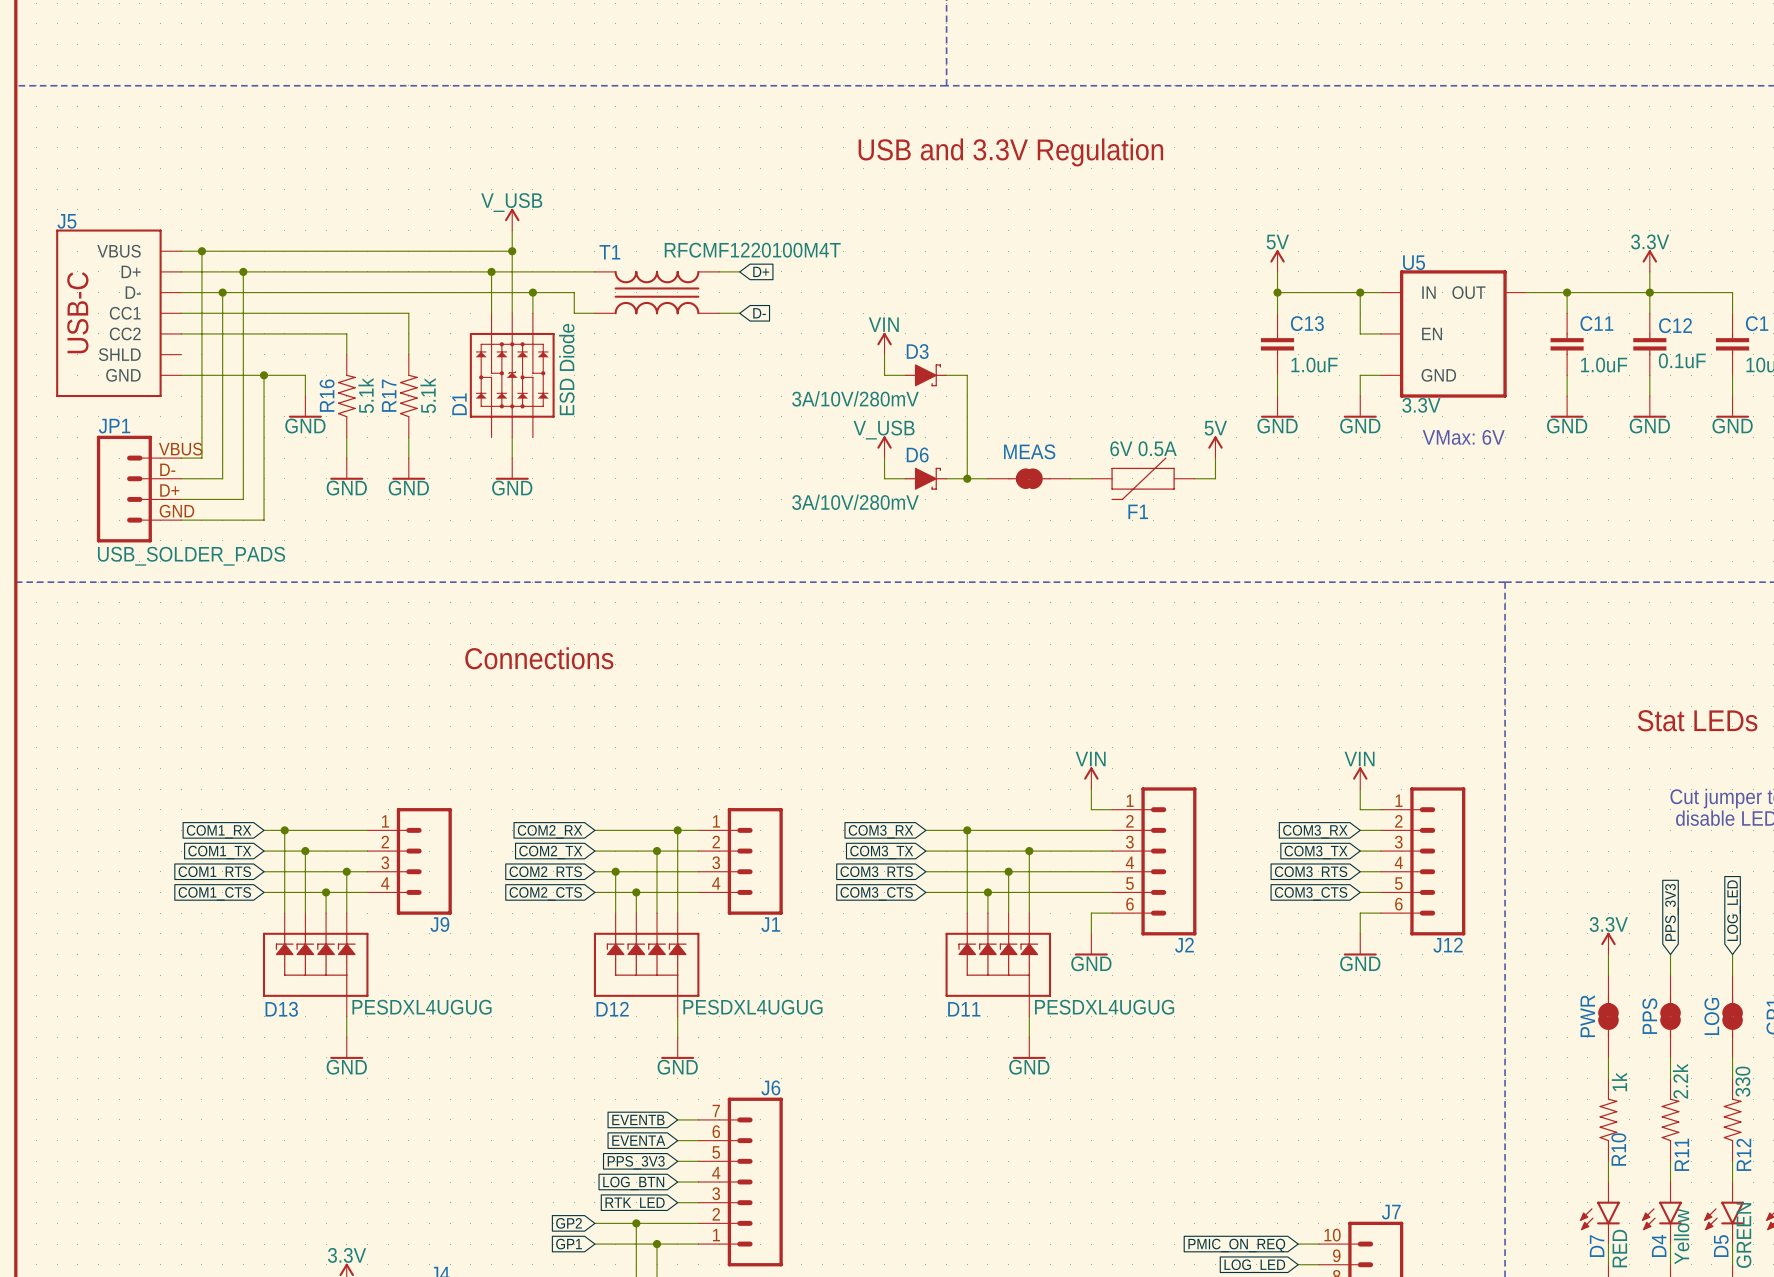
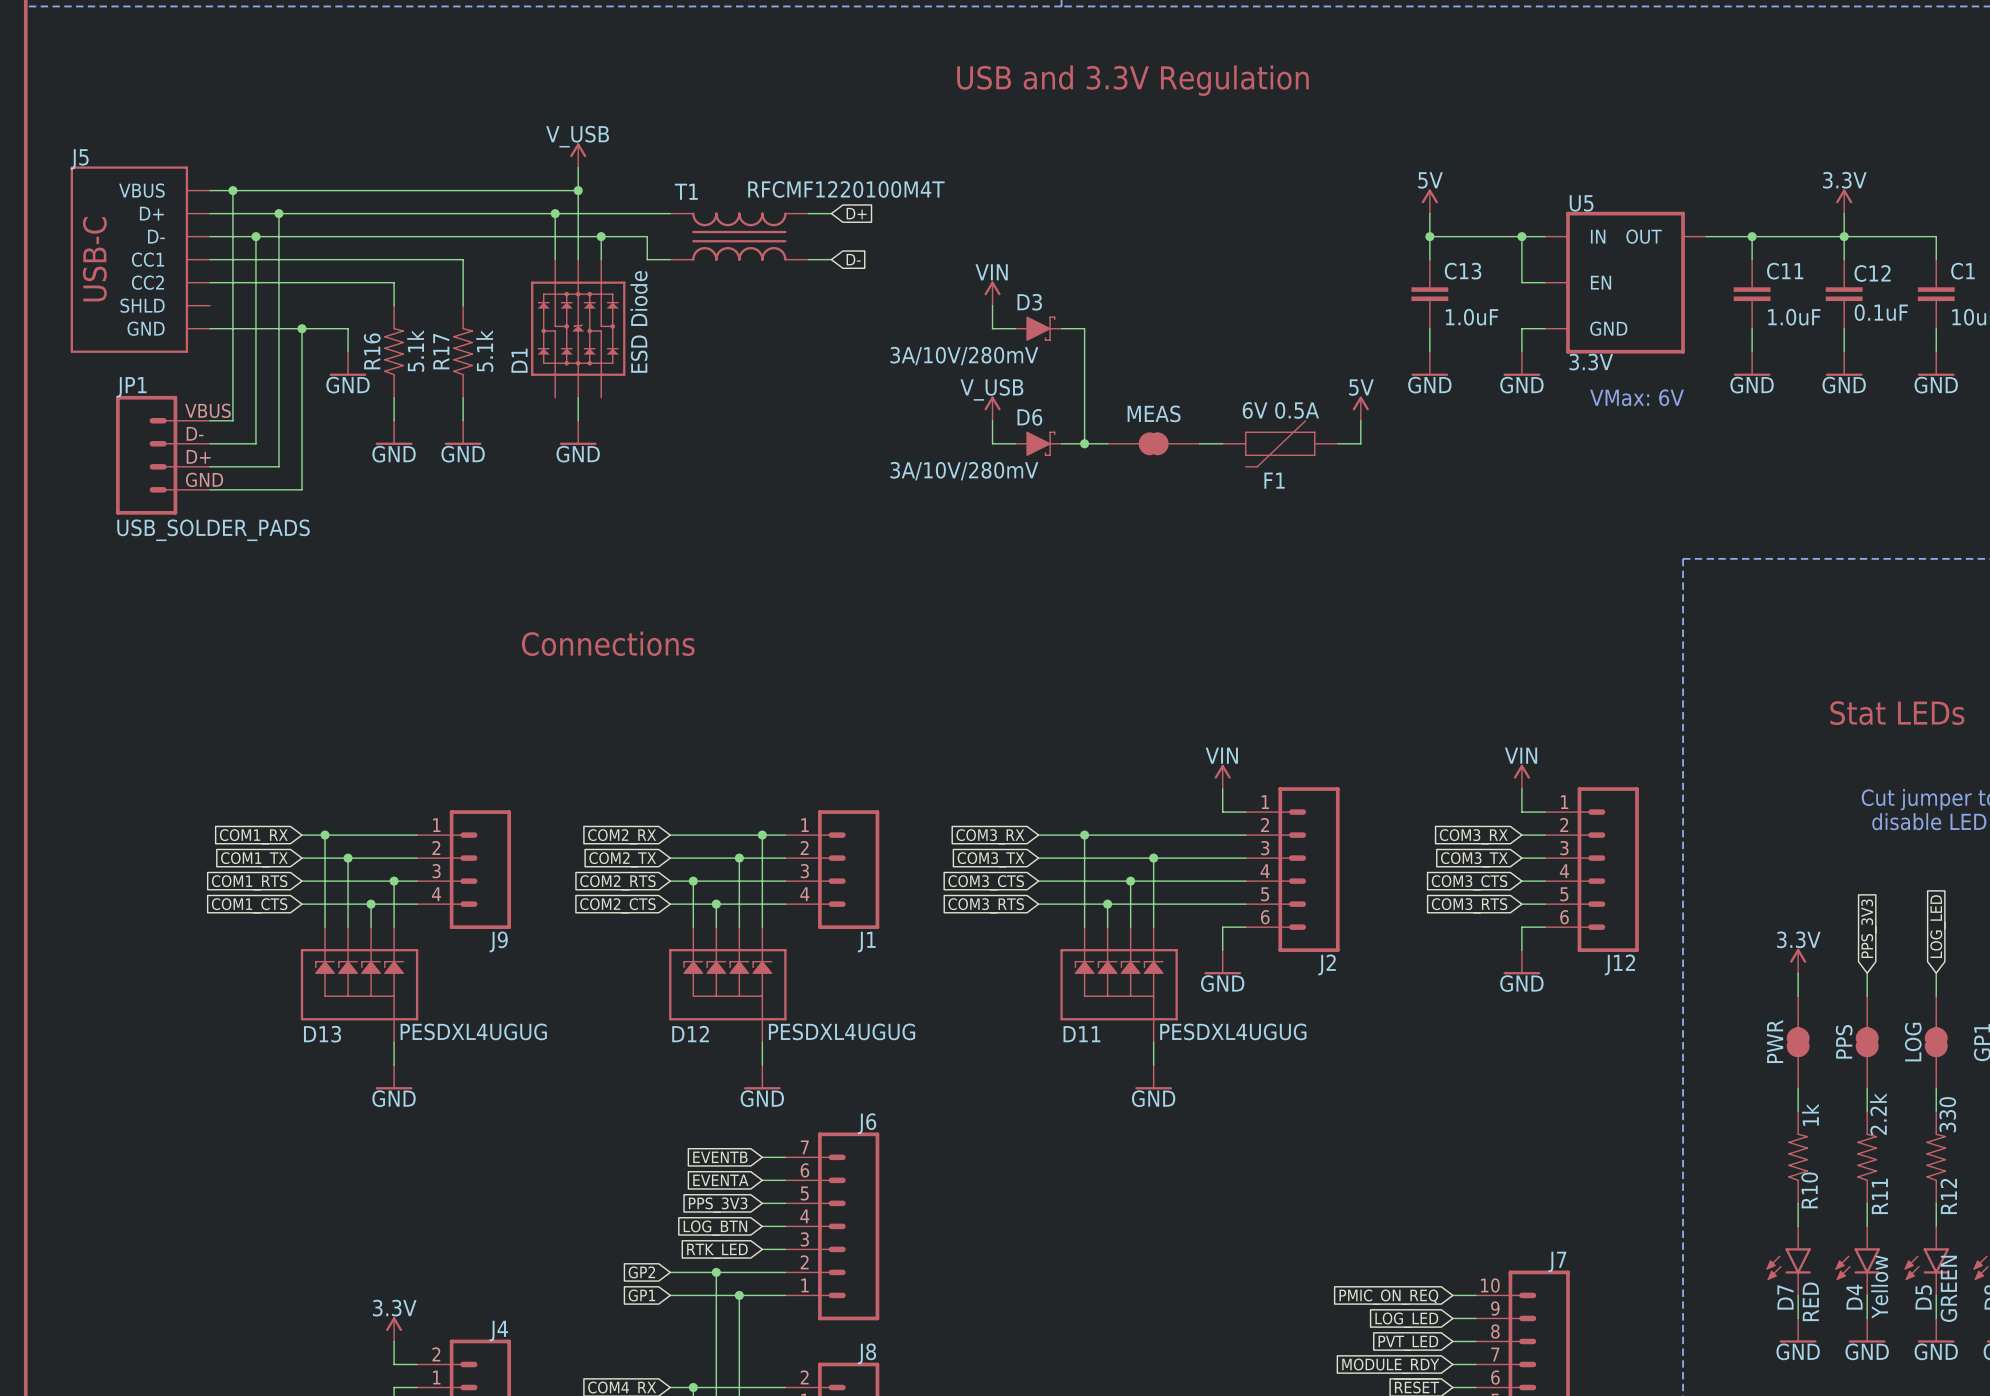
line: (15, 582) (1505, 582) -> none
global label: COM3_RTS (876, 873) -> COM3_CTS (986, 882)
global label: COM3_RTS (1311, 873) -> COM3_CTS (1469, 882)
global label: COM3_CTS (876, 893) -> COM3_RTS (986, 905)
global label: COM3_CTS (1311, 893) -> COM3_RTS (1469, 905)

